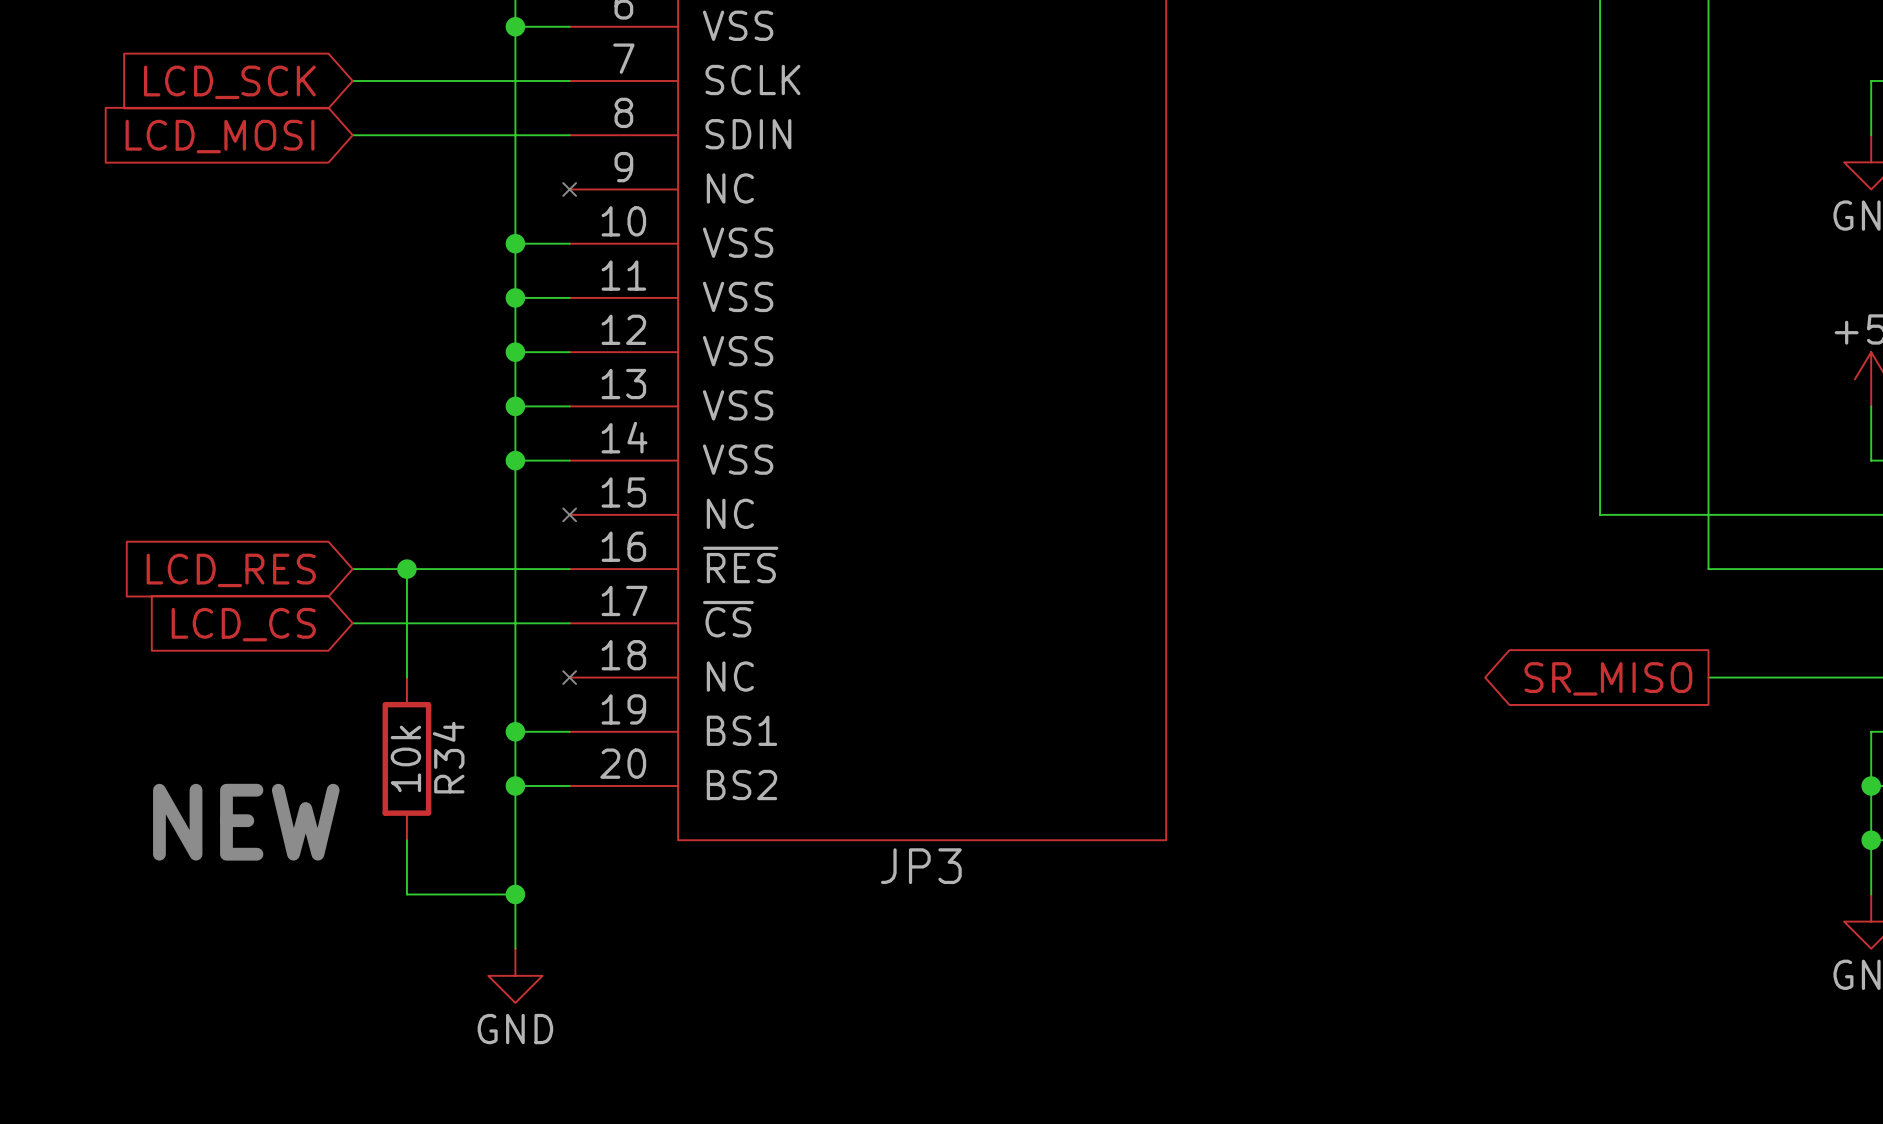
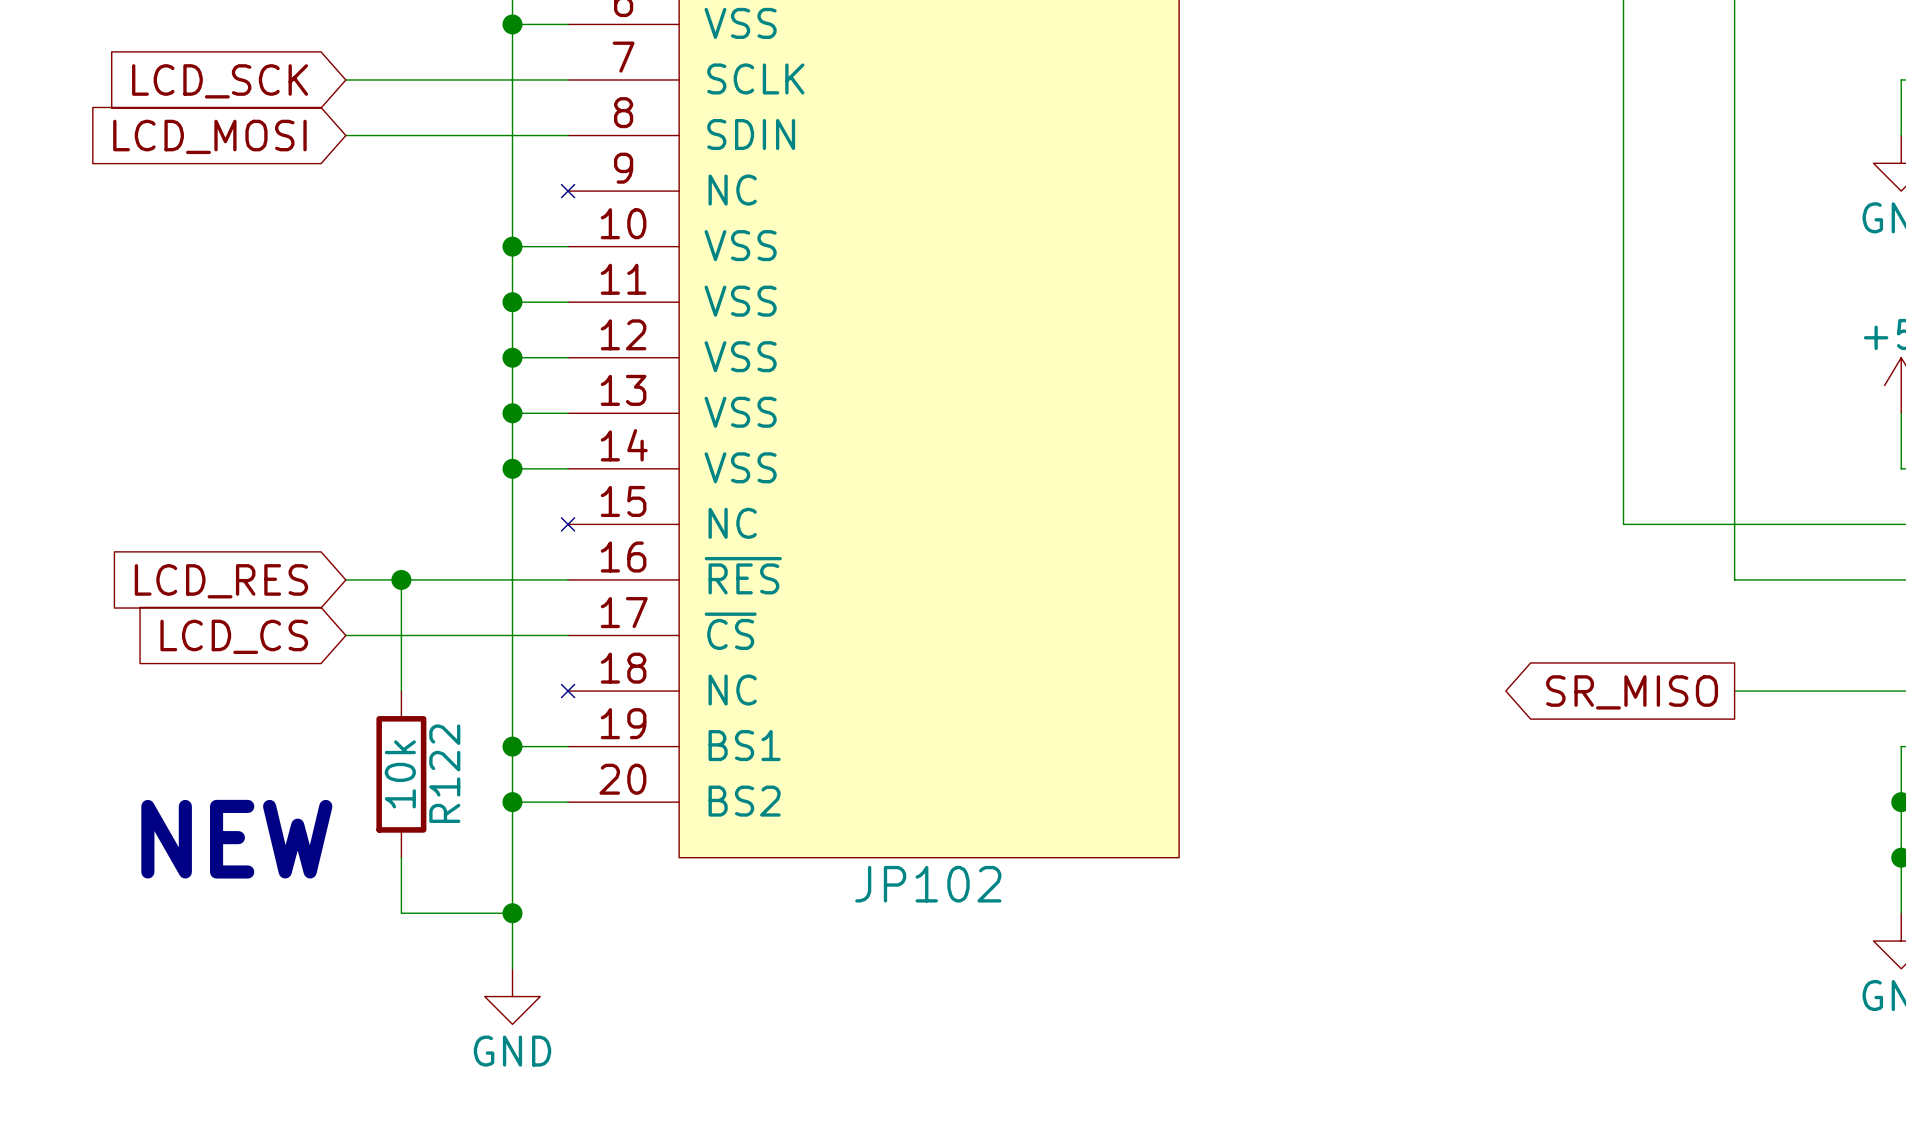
R34 name: R34 (448, 757) -> R122 (444, 773)
JP3 name: JP3 (921, 866) -> JP102 (928, 884)

